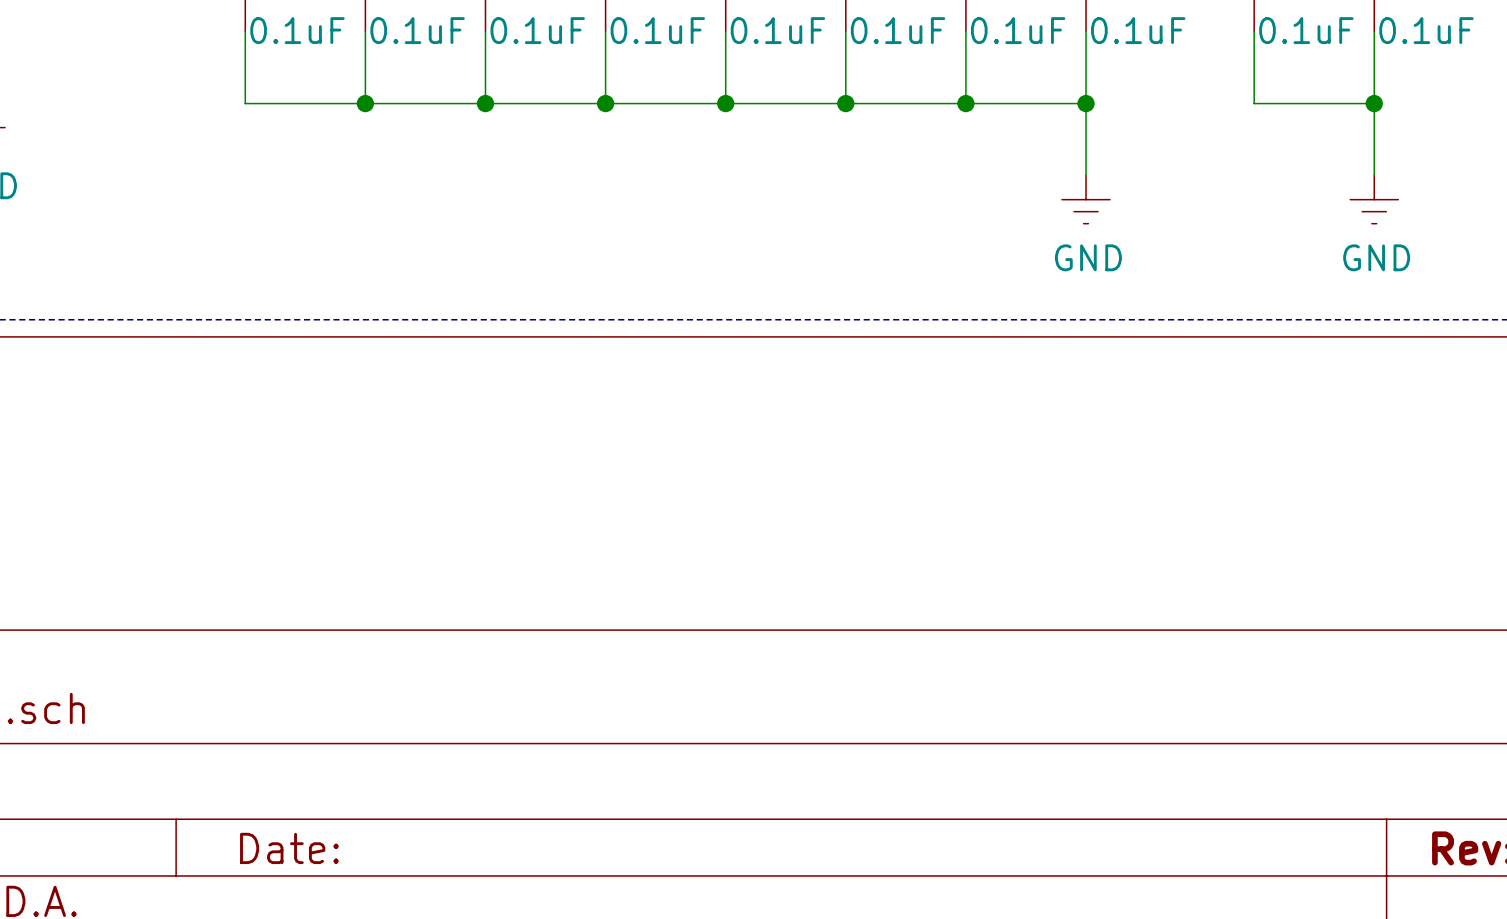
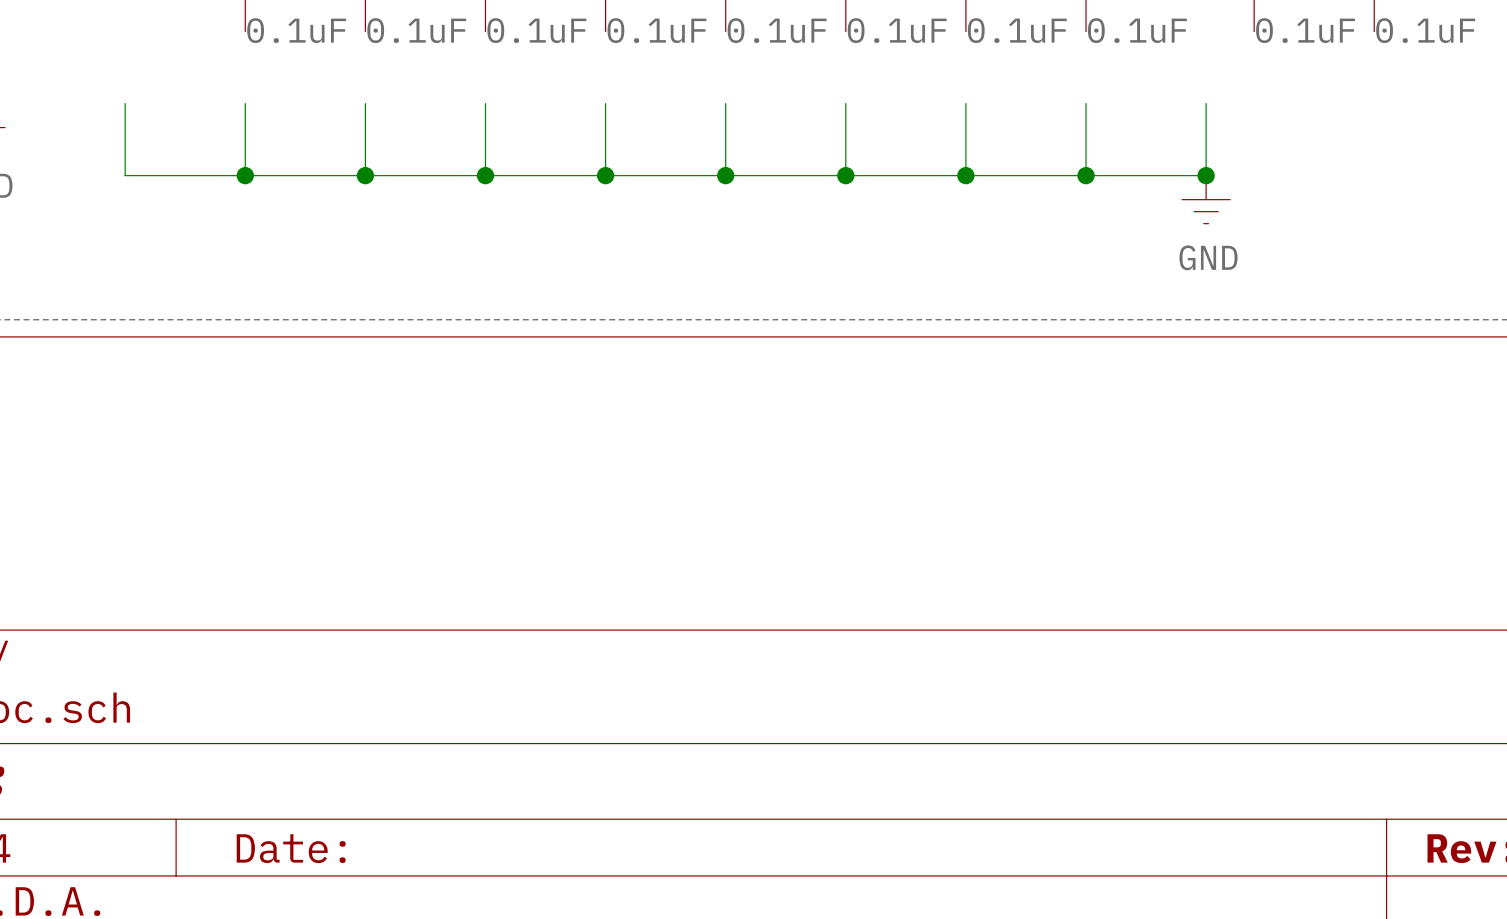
wire: (245, 31) (245, 103) (1086, 103) (1086, 31) -> none
wire: (365, 31) (365, 103) -> (365, 175) (365, 103)
wire: (485, 31) (485, 103) -> (485, 175) (485, 103)
wire: (605, 31) (605, 103) -> (605, 175) (605, 103)
wire: (725, 31) (725, 103) -> (725, 175) (725, 103)
wire: (845, 31) (845, 103) -> (845, 175) (845, 103)
wire: (965, 31) (965, 103) -> (965, 175) (965, 103)
wire: (1254, 31) (1254, 103) (1374, 103) -> none
wire: (1374, 31) (1374, 175) -> none
wire: none -> (125, 103) (125, 175) (1206, 175) (1206, 103)
wire: none -> (245, 103) (245, 175)
junction: (365, 103) -> none
junction: (485, 103) -> none
junction: (605, 103) -> none
junction: (725, 103) -> none
junction: (845, 103) -> none
junction: (965, 103) -> none
junction: (1086, 103) -> none
junction: (1374, 103) -> none
junction: none -> (245, 175)
junction: none -> (365, 175)
junction: none -> (485, 175)
junction: none -> (605, 175)
junction: none -> (725, 175)
junction: none -> (845, 175)
junction: none -> (965, 175)
junction: none -> (1086, 175)
junction: none -> (1206, 175)
power symbol: GND (1086, 199) -> none
power symbol: none -> GND (1206, 199)
power symbol: GND (1374, 199) -> none

